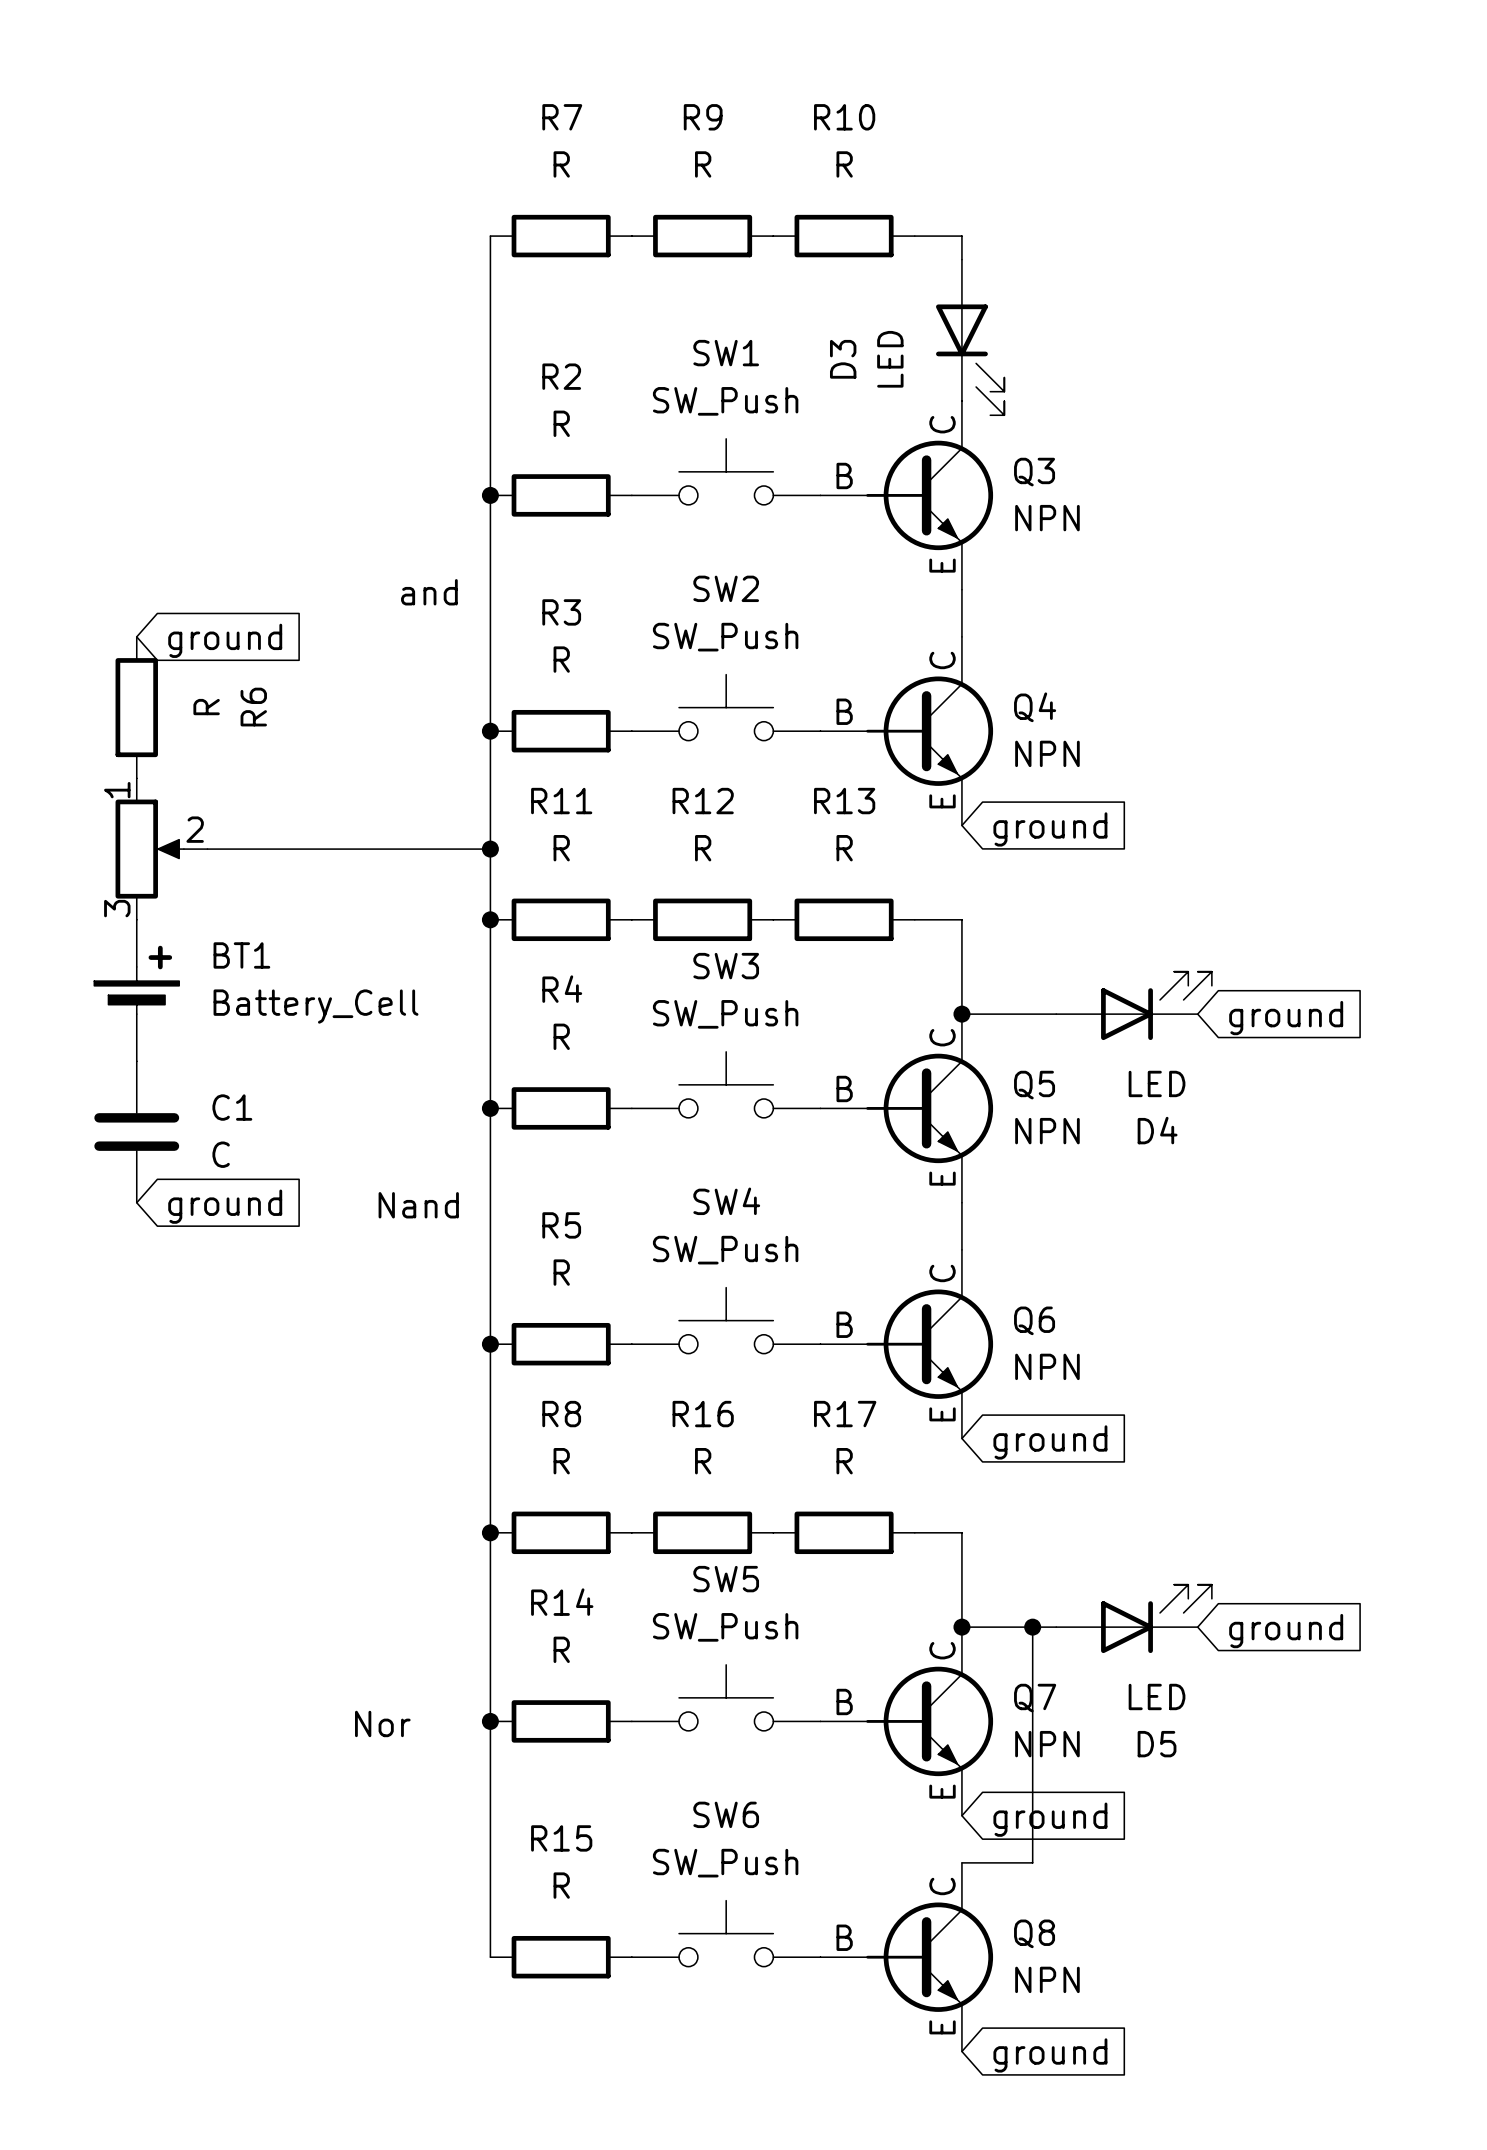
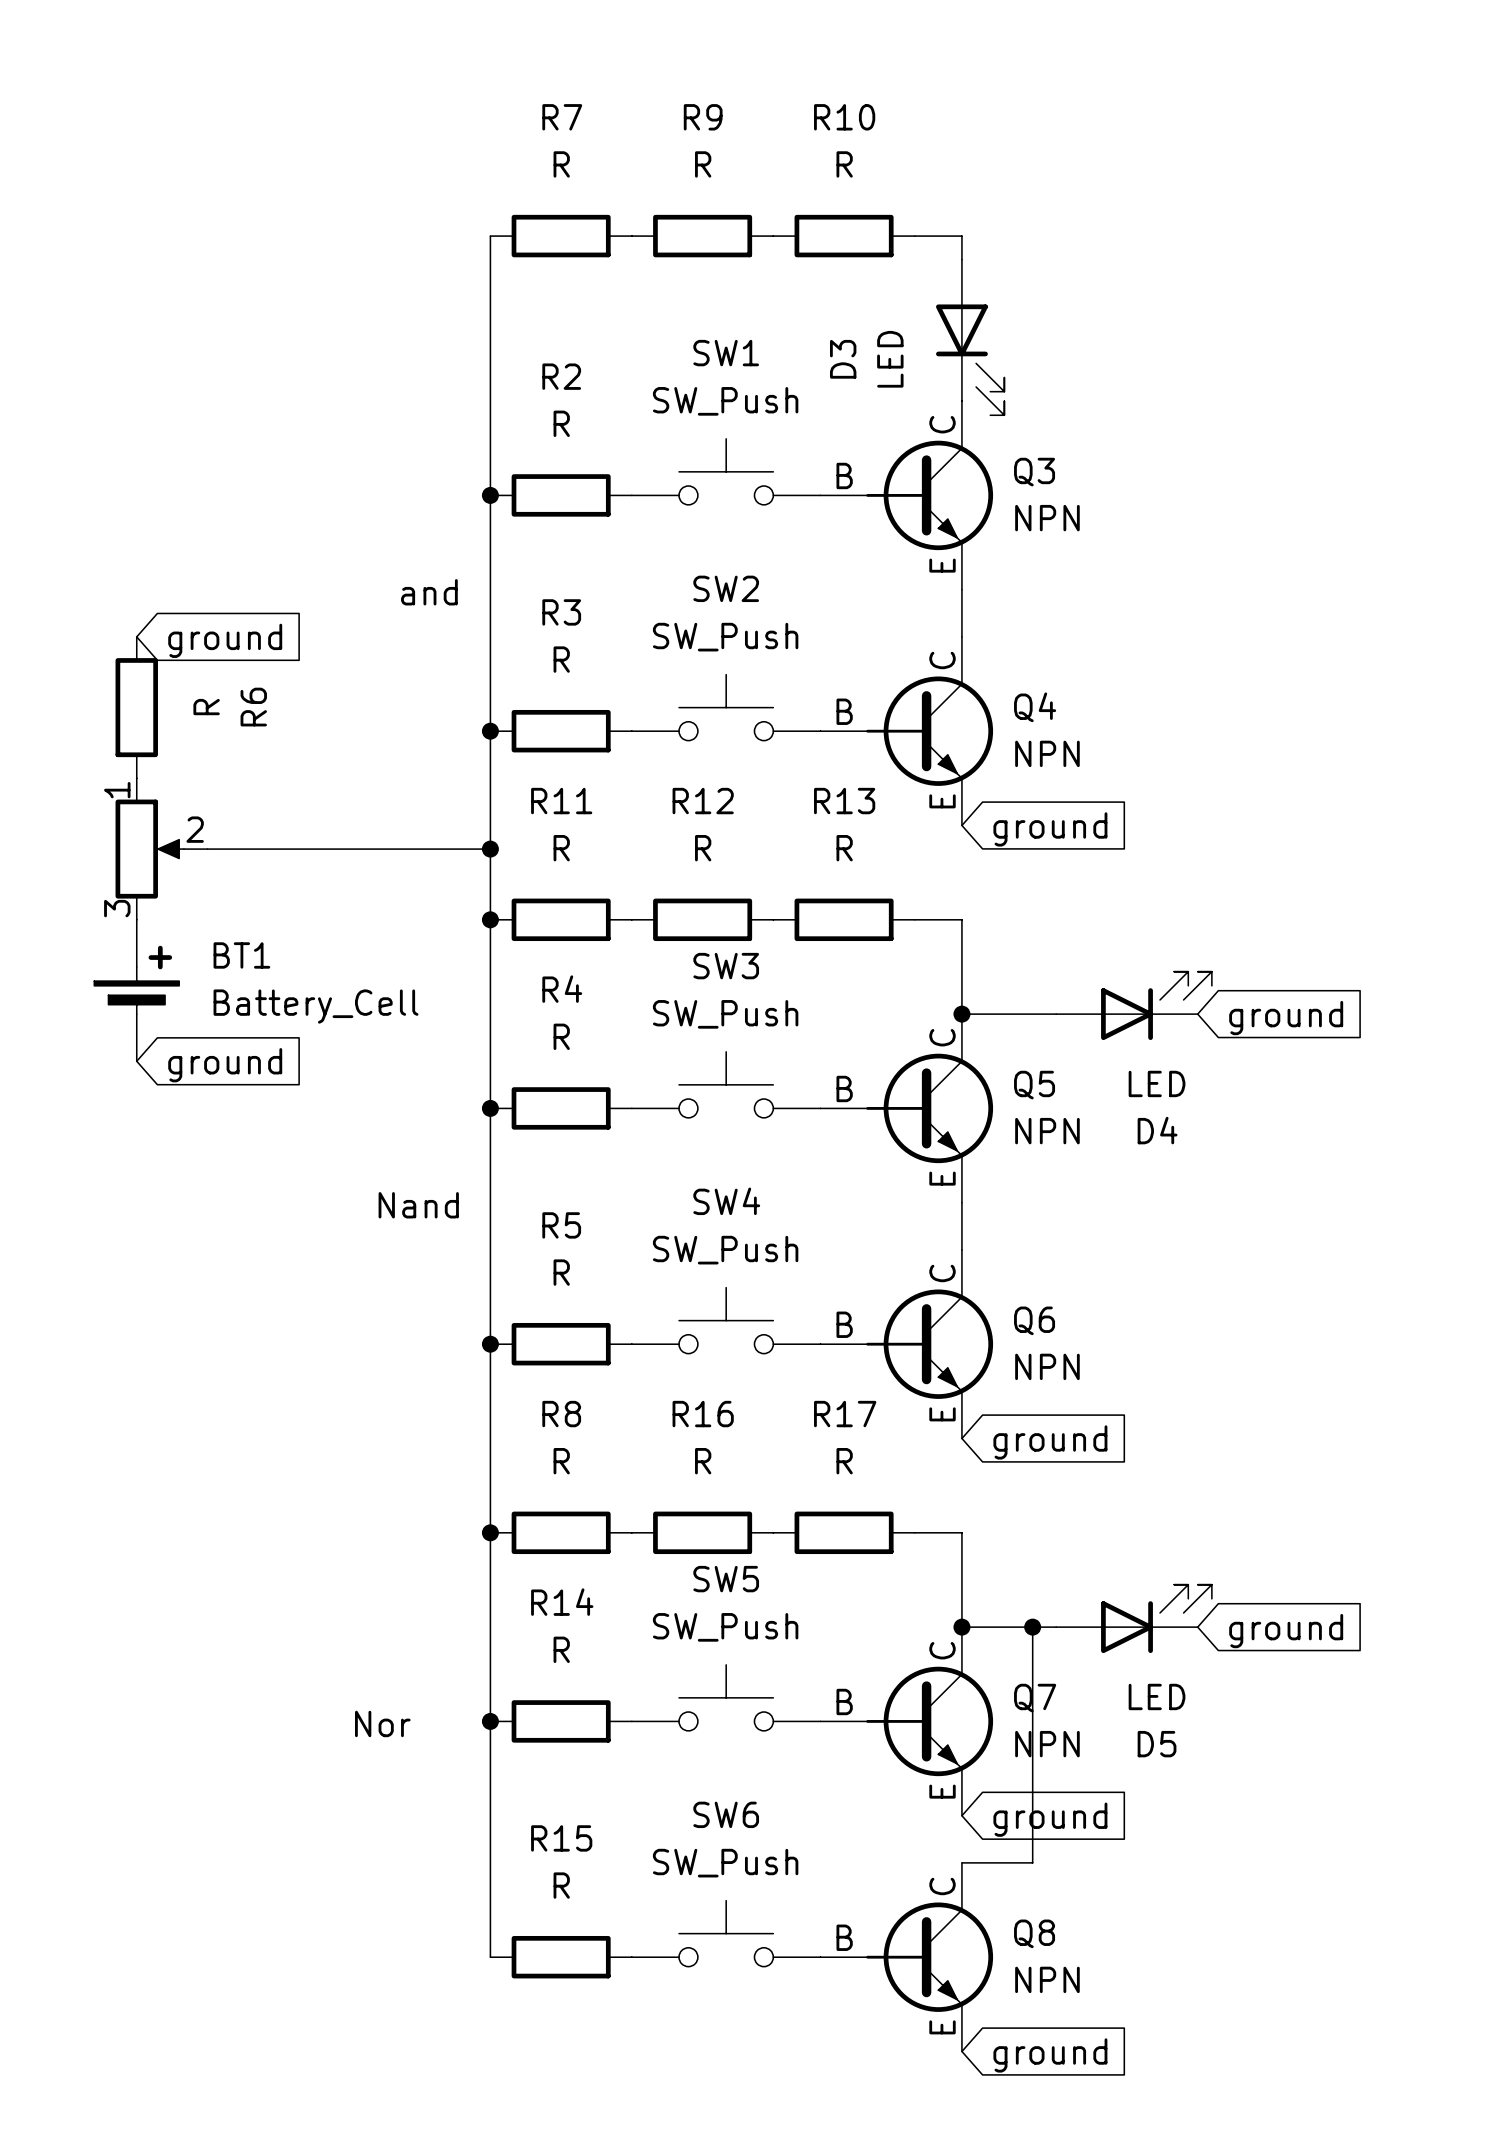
C1: C (136, 1132) -> none
global label position: ground (225, 1206) -> ground (225, 1065)

